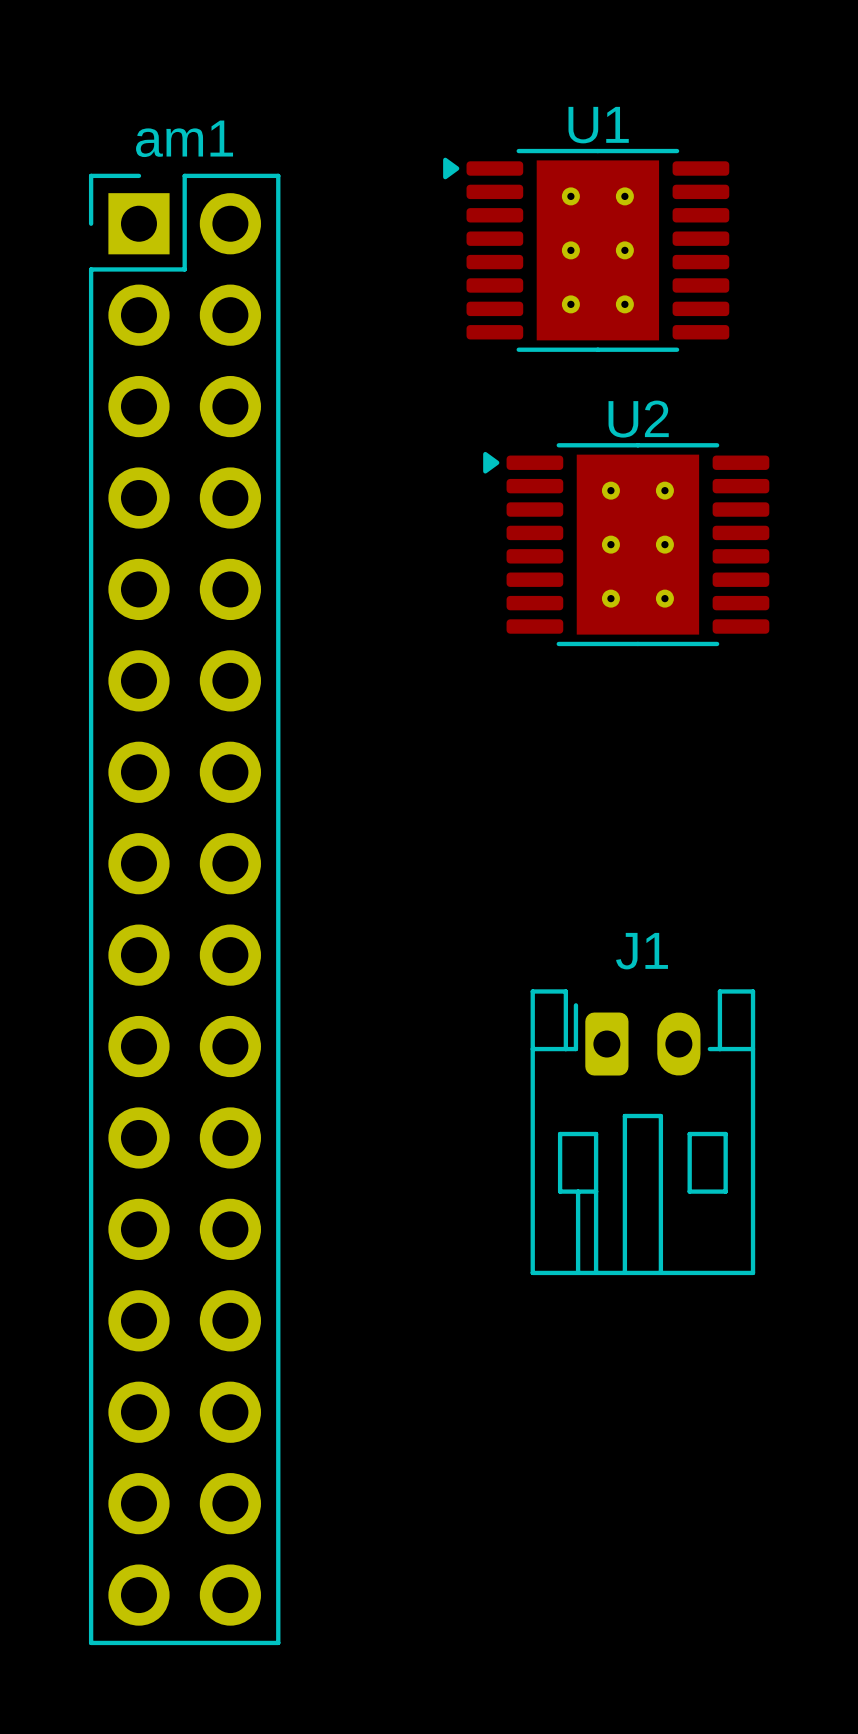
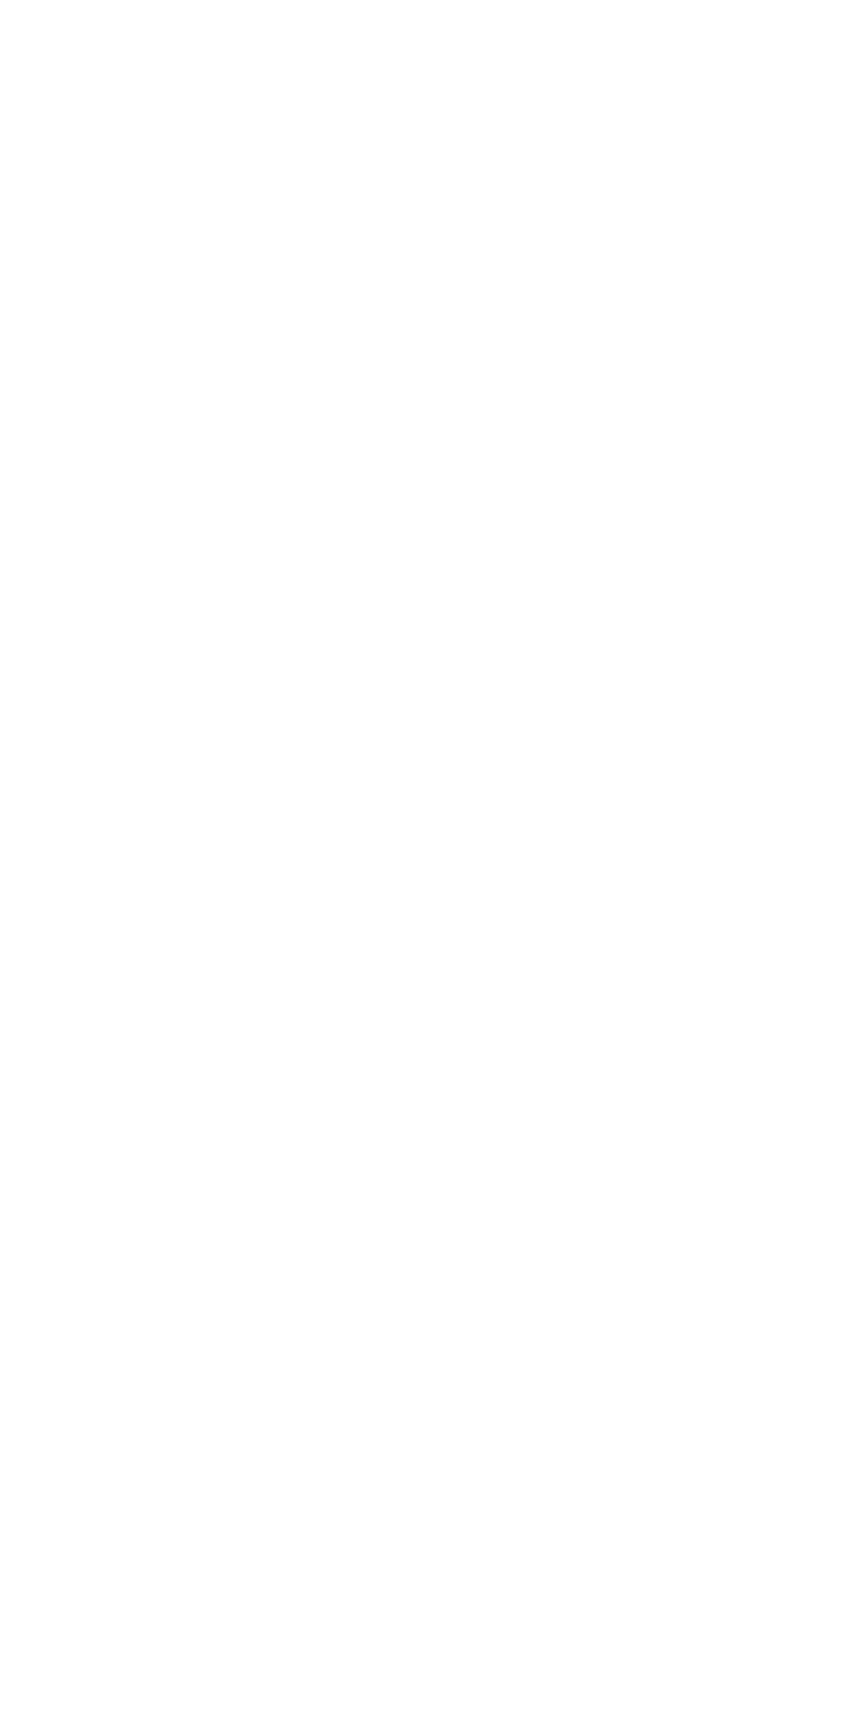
U1: (586, 250) -> none
U2: (626, 544) -> none
am1: (184, 909) -> none
J1: (642, 1132) -> none

